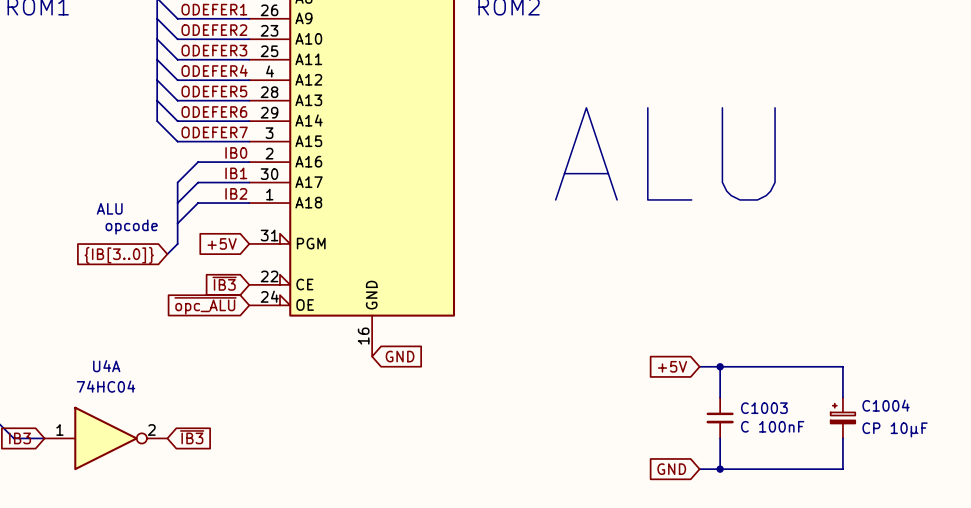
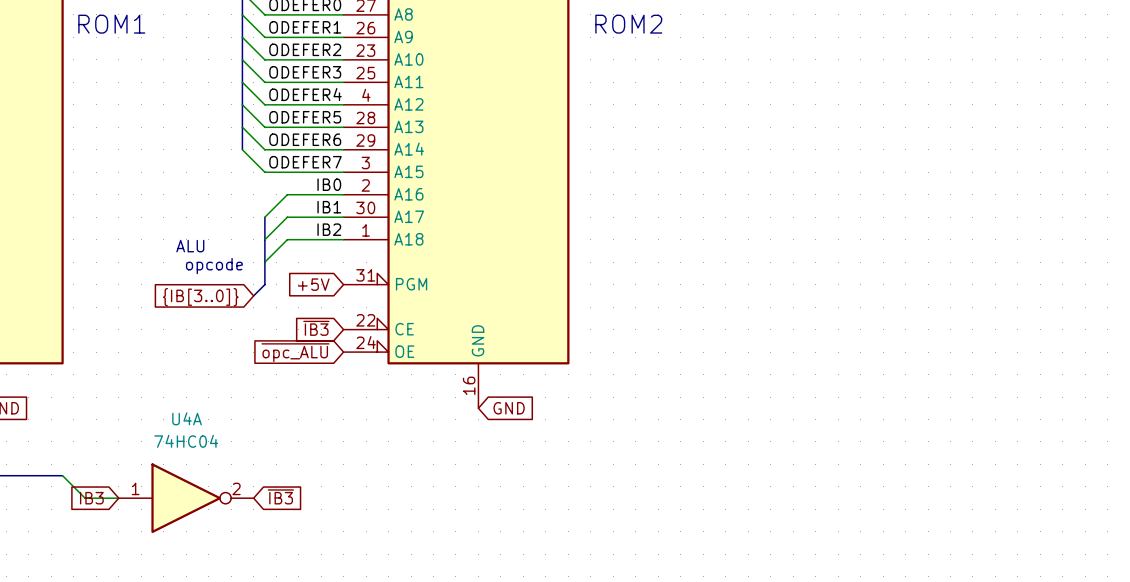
text: ALU (665, 153) -> none
global label: +5V (672, 366) -> none
wire: (699, 366) (842, 366) (842, 397) -> none
wire: (720, 366) (720, 397) -> none
junction: (720, 366) -> none
C1003: C 100nF (720, 417) -> none
C1004: CP 10μF (842, 417) -> none
wire: (720, 438) (720, 469) -> none
wire: (842, 438) (842, 469) (699, 469) -> none
global label: GND (671, 469) -> none
junction: (720, 469) -> none

